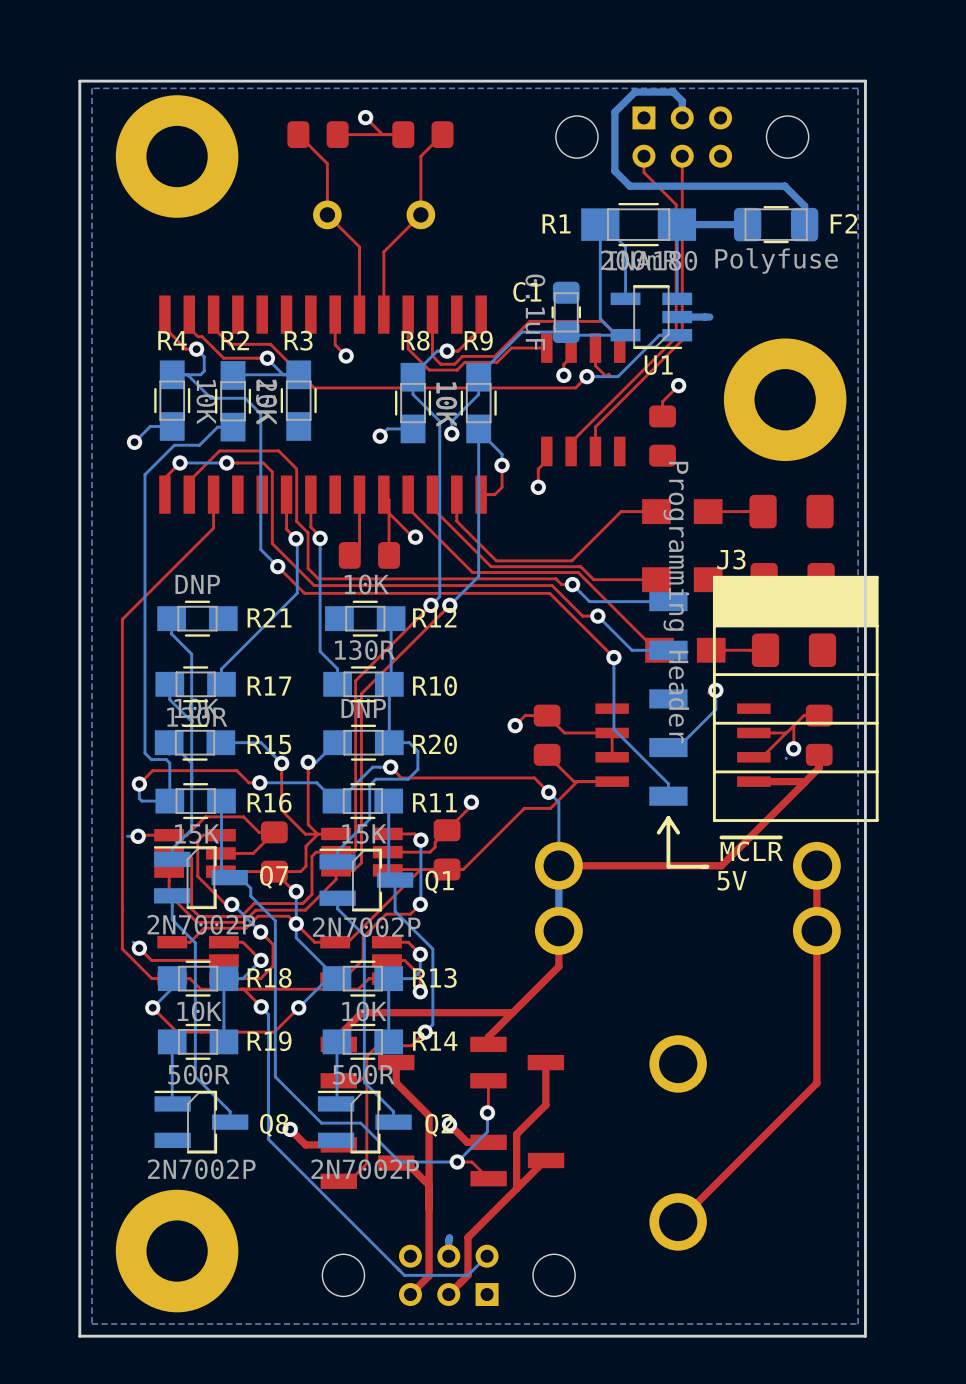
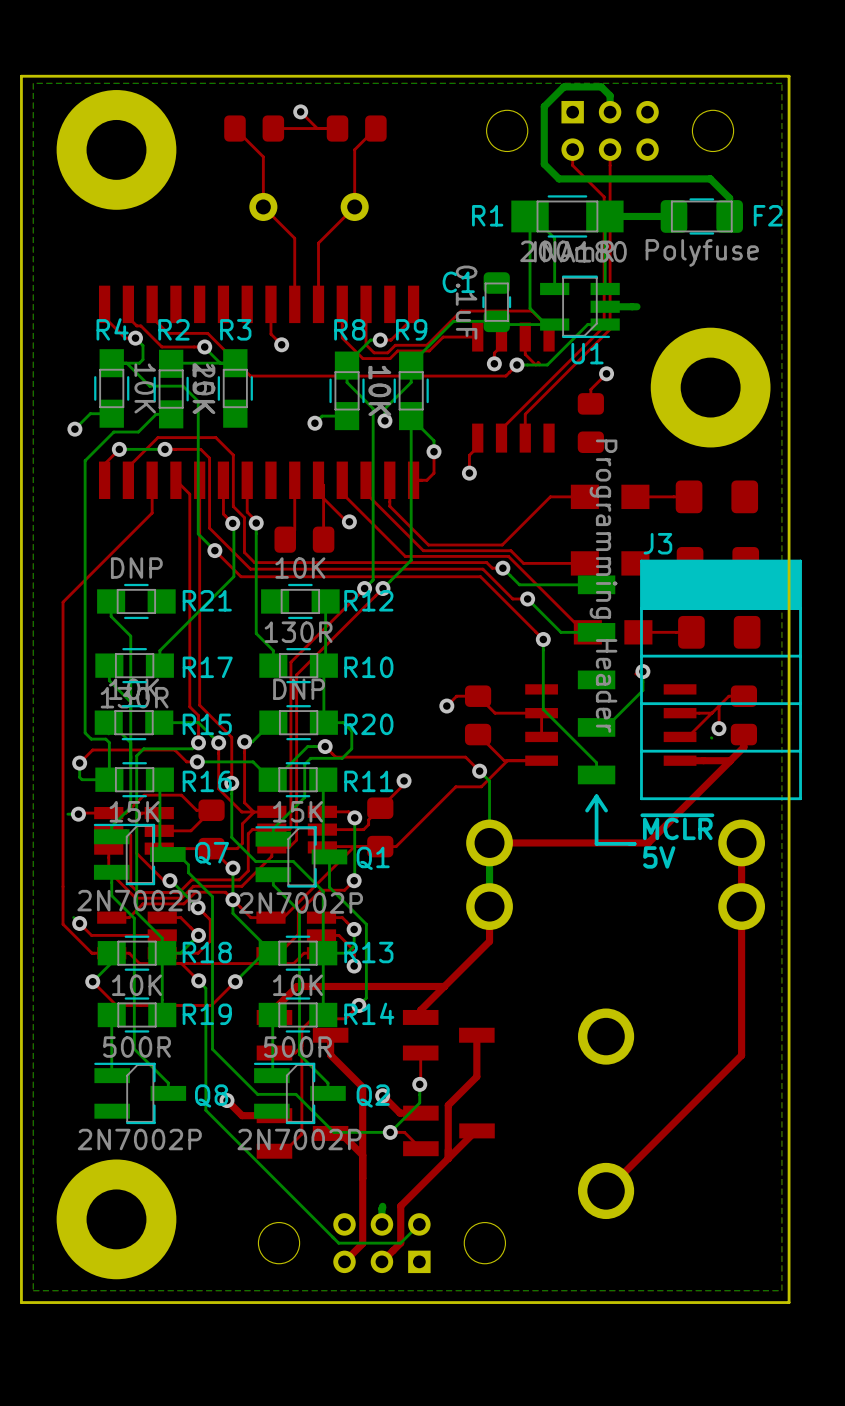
top track: none -> (175, 480) (189, 494) (189, 706) (198, 715) (198, 742)
top track: none -> (199, 480) (199, 705) (231, 737) (231, 783)
bottom track: none -> (198, 742) (192, 748) (143, 748) (136, 755) (136, 912) (162, 938) (162, 953)
via: none -> (198, 742)
bottom track: none -> (231, 783) (231, 837) (255, 861) (293, 861) (323, 891) (323, 953)
via: none -> (231, 783)

